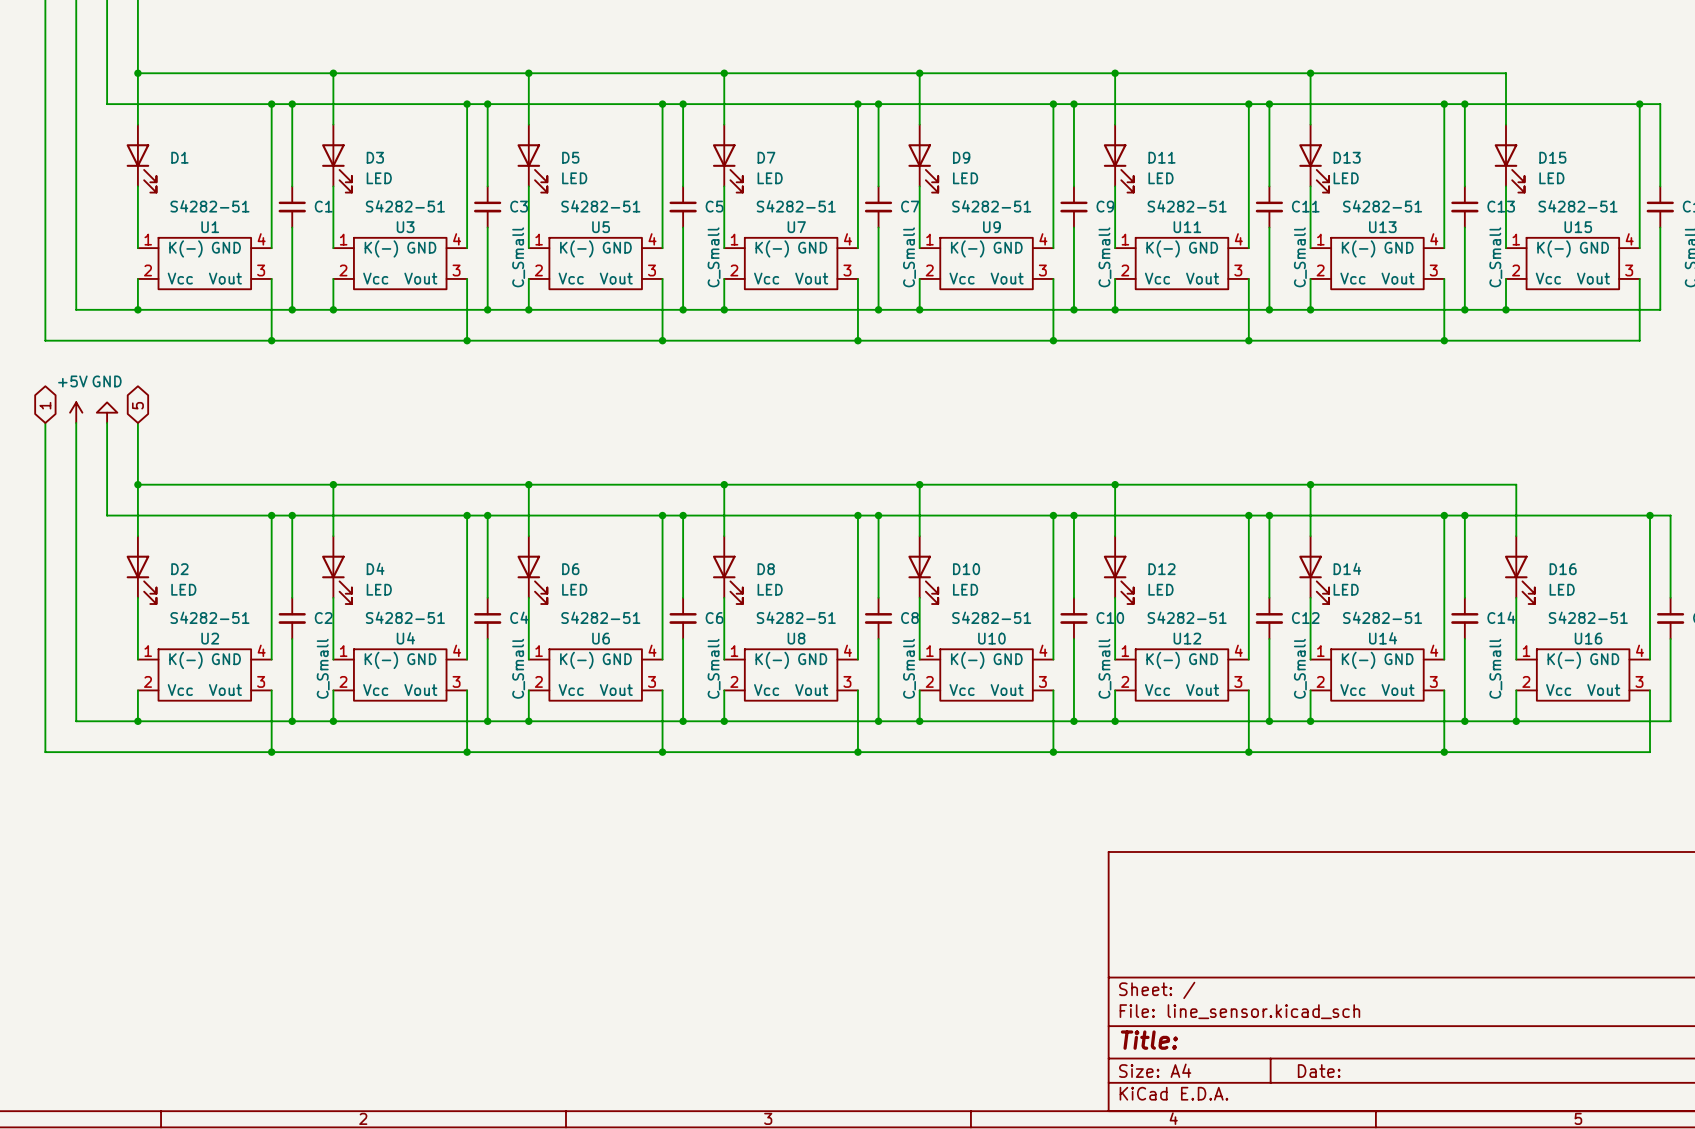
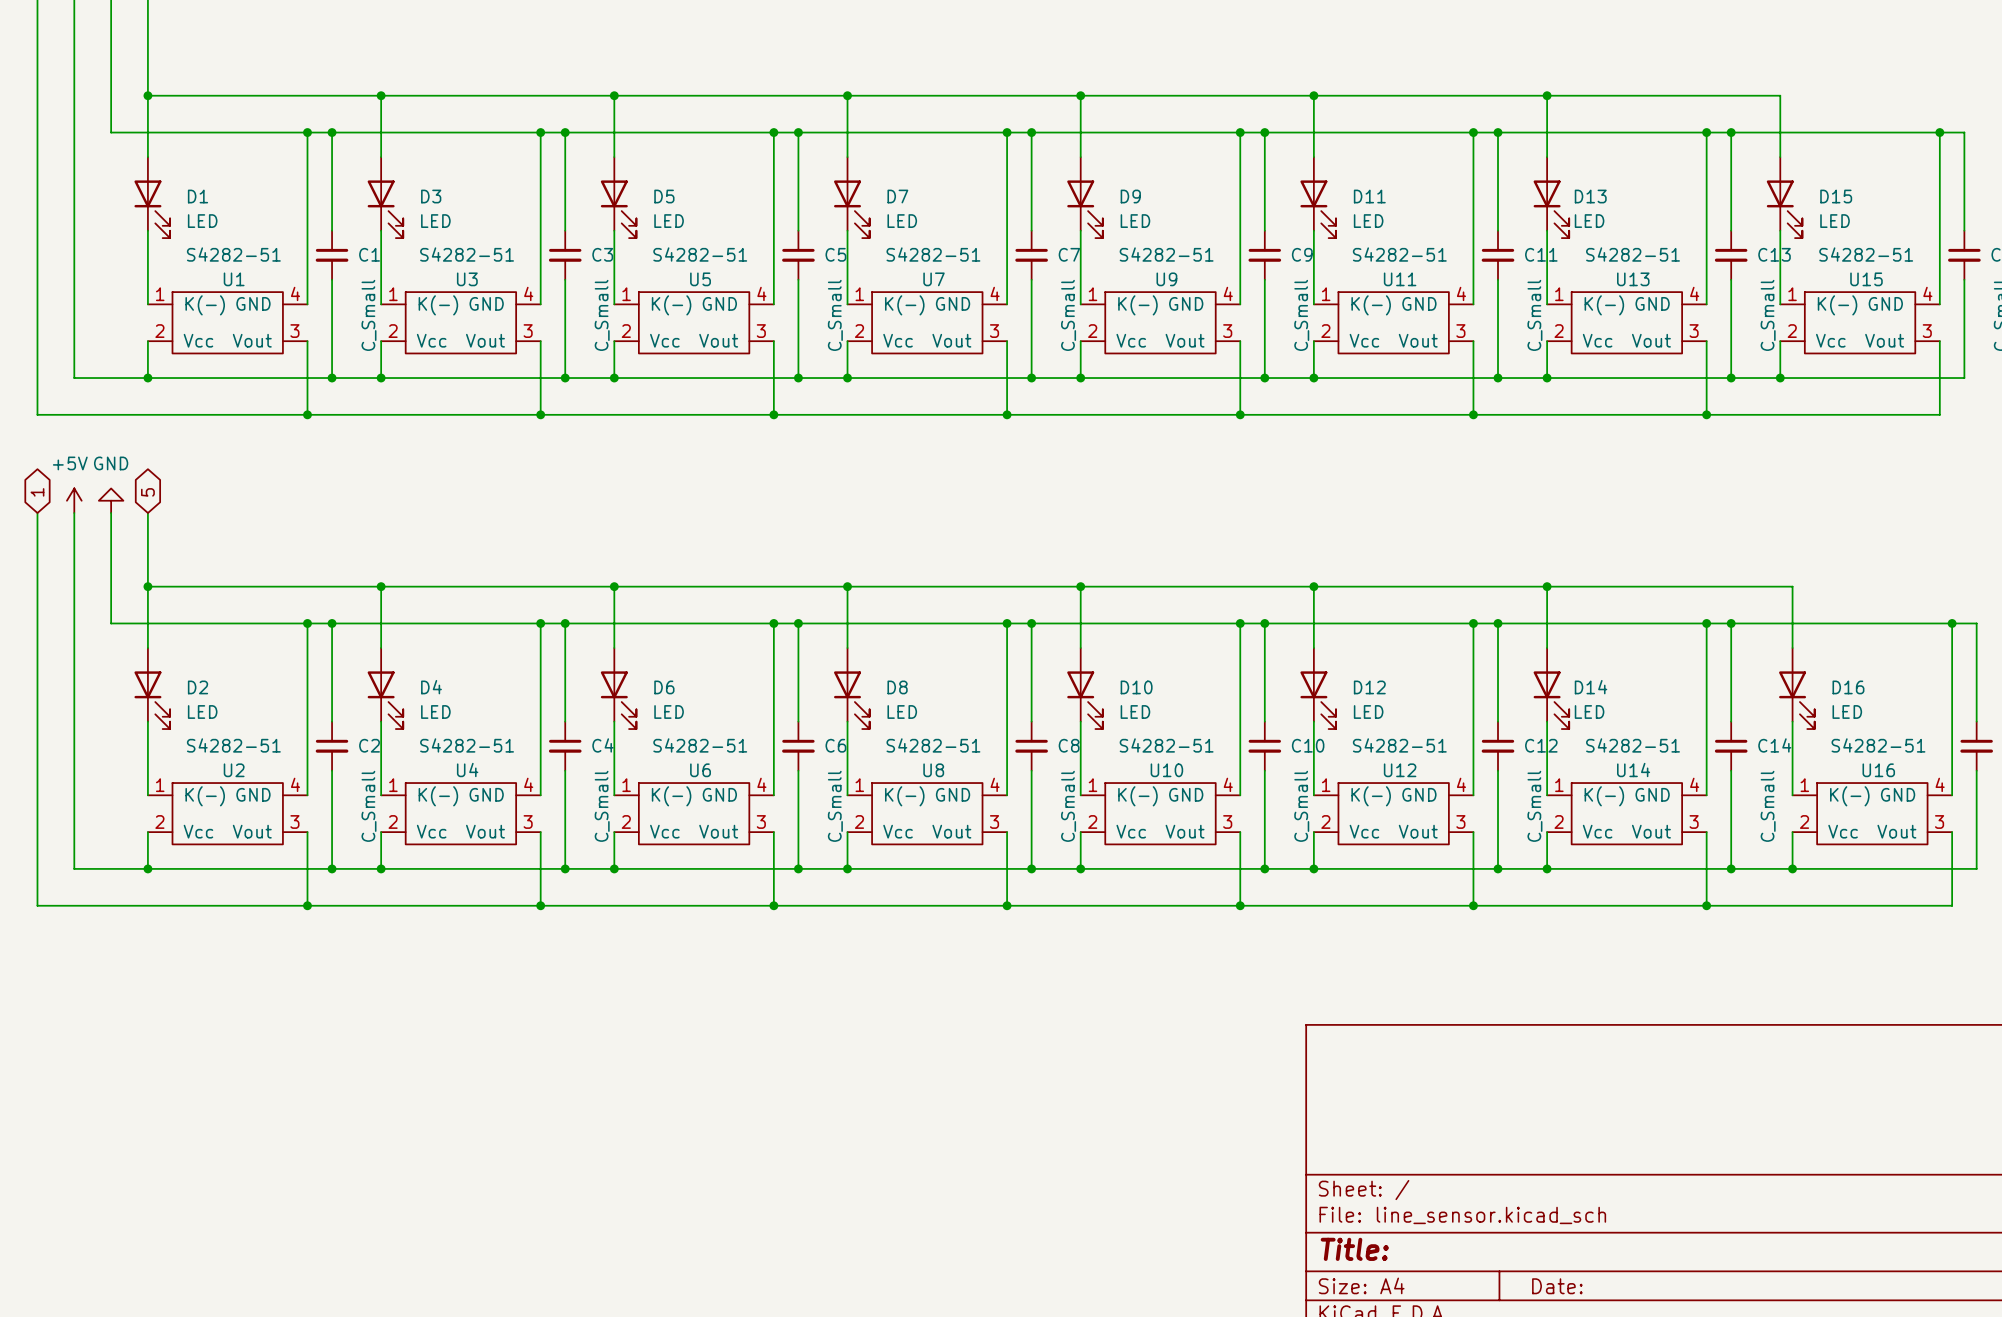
D1 value: none -> LED (202, 221)
C1 value: none -> C_Small (368, 315)

